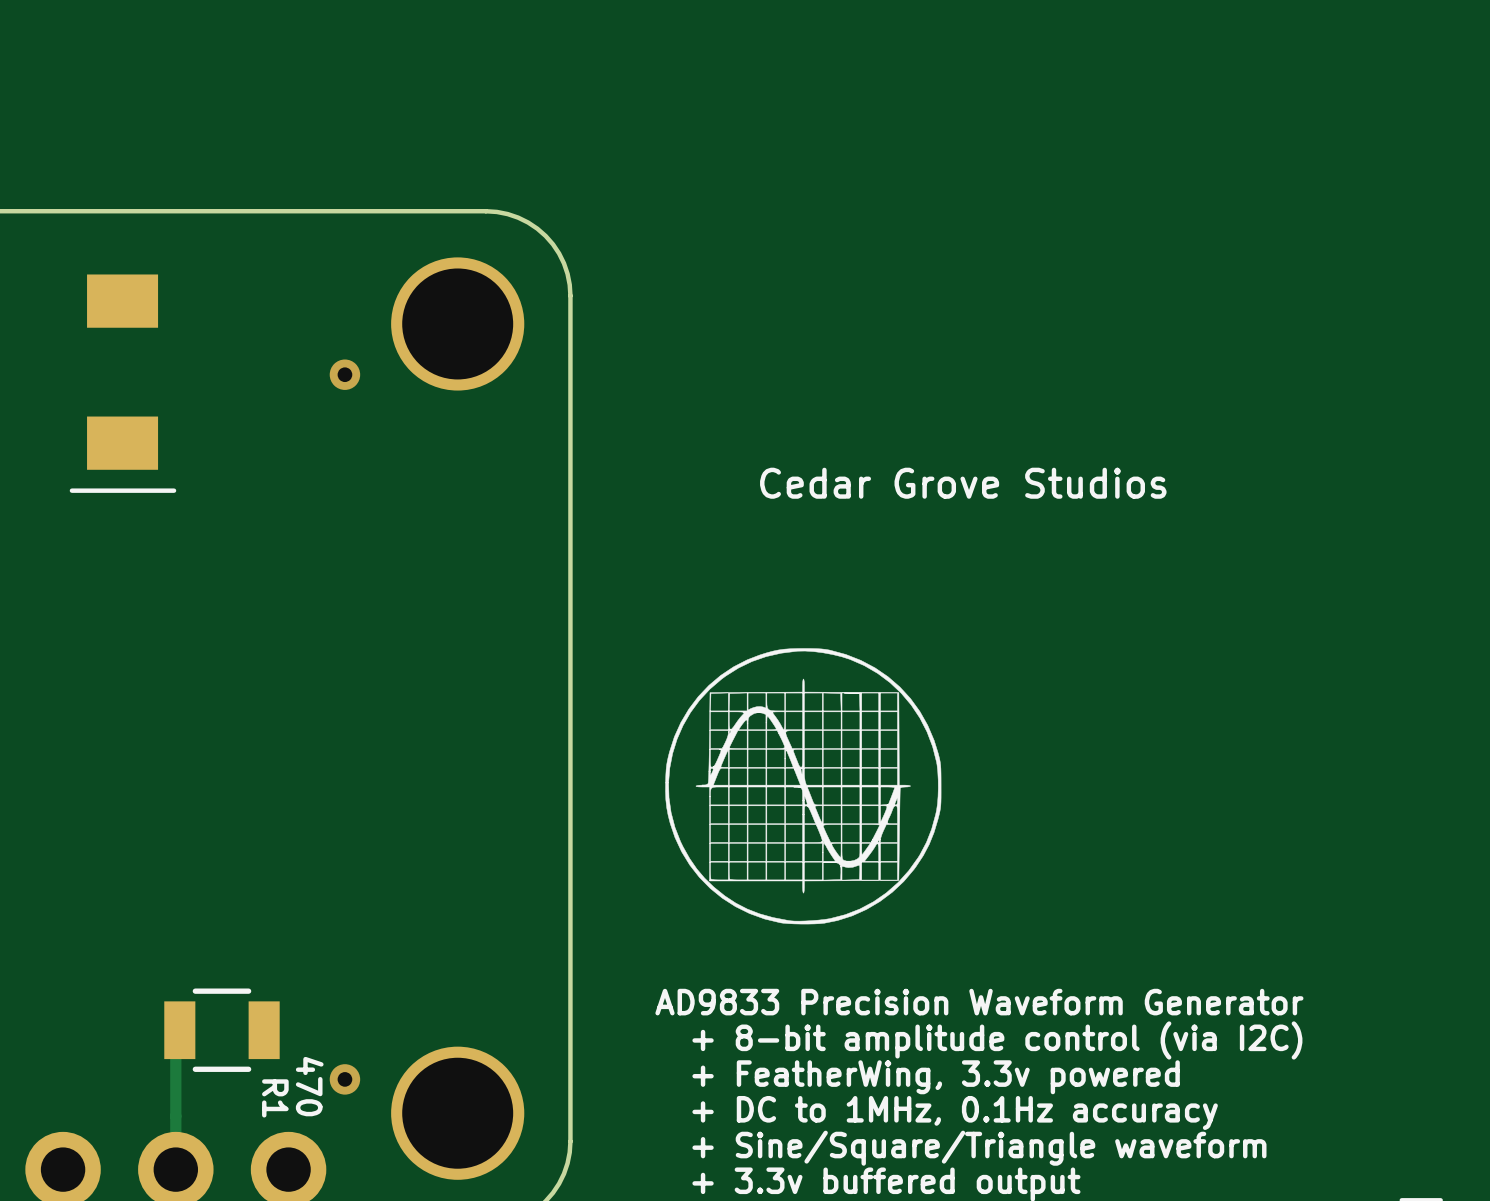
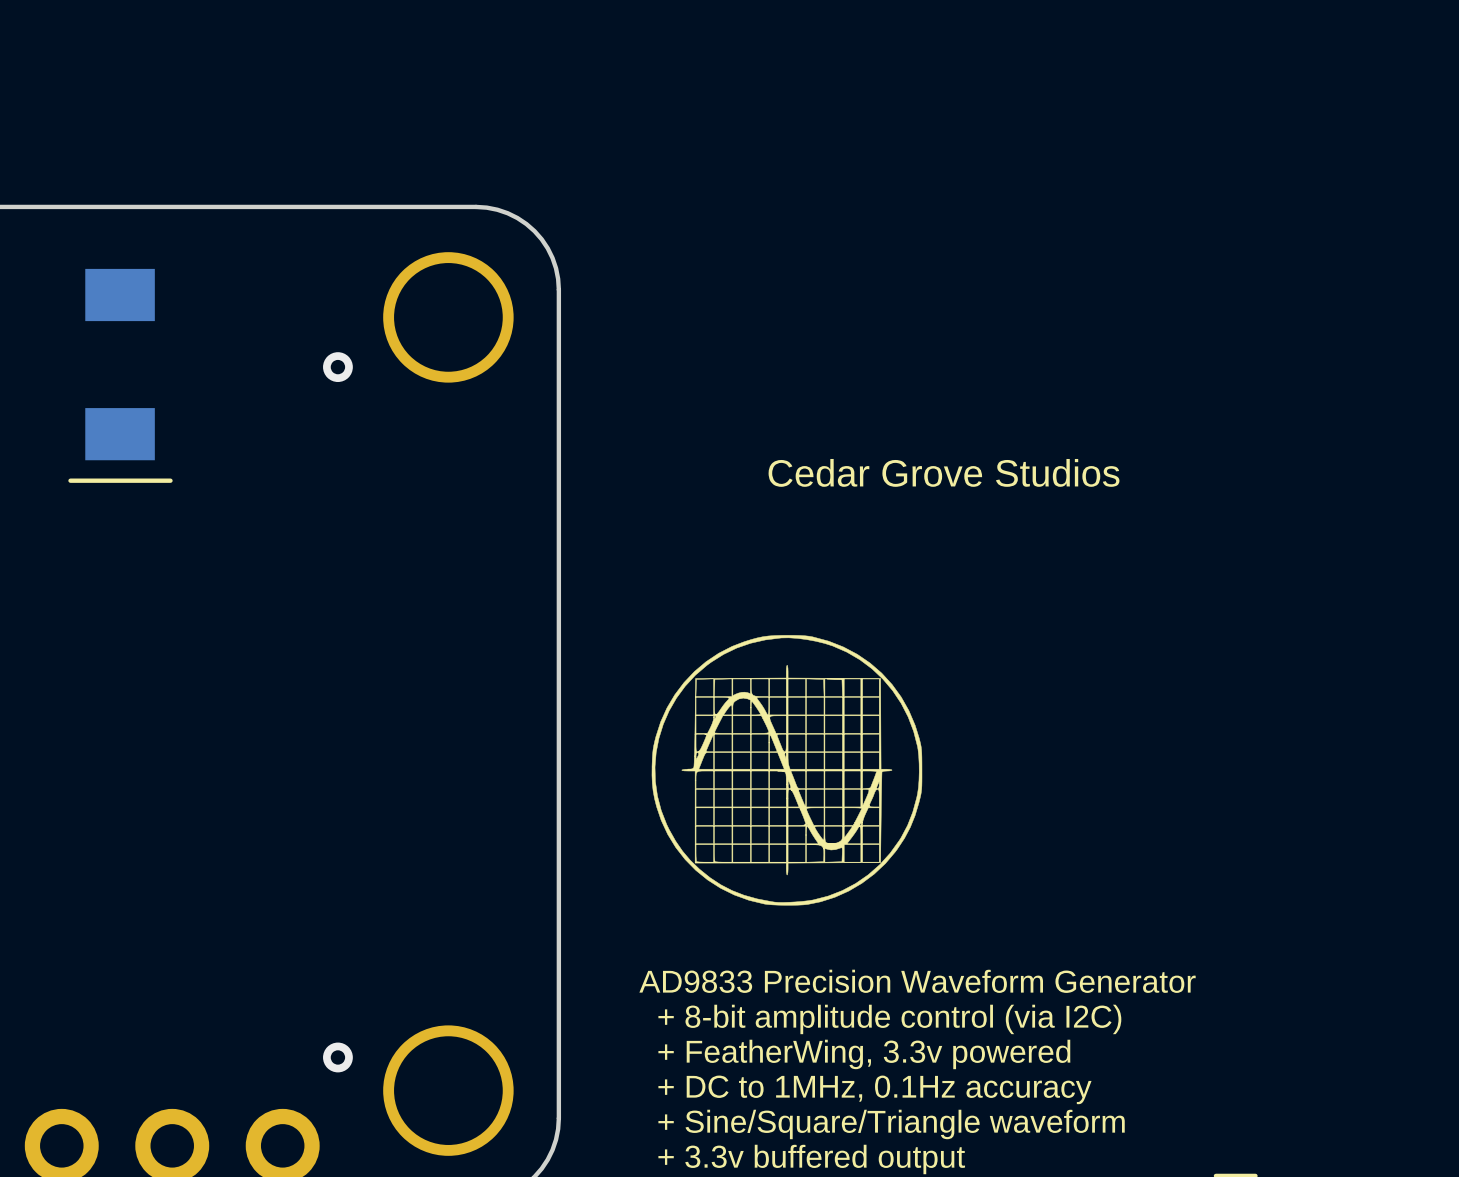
track: (175, 1027) (175, 1169) -> none
R1: 470 (221, 1030) -> none

